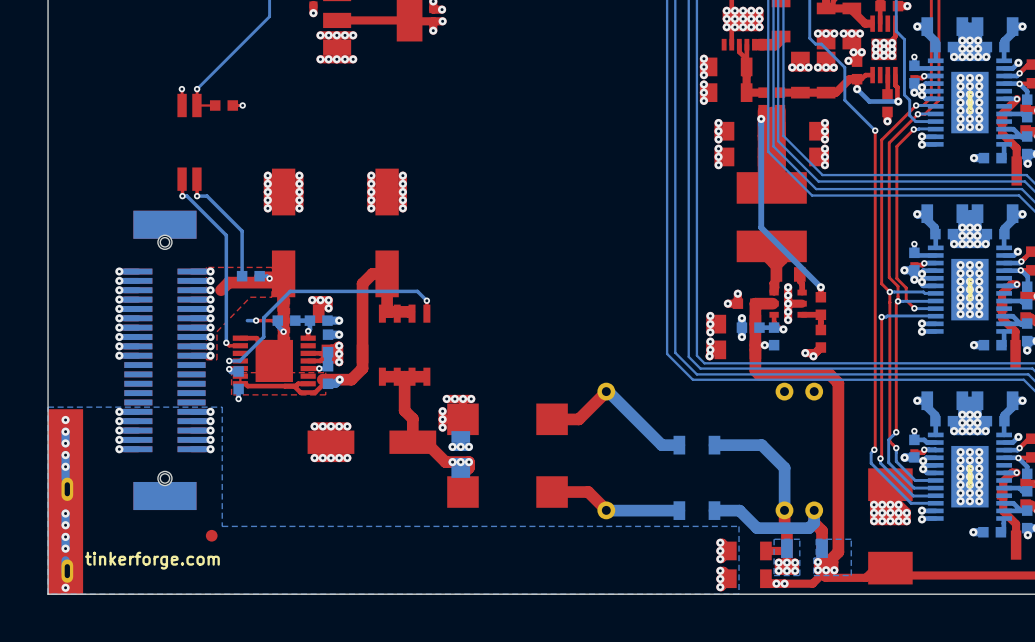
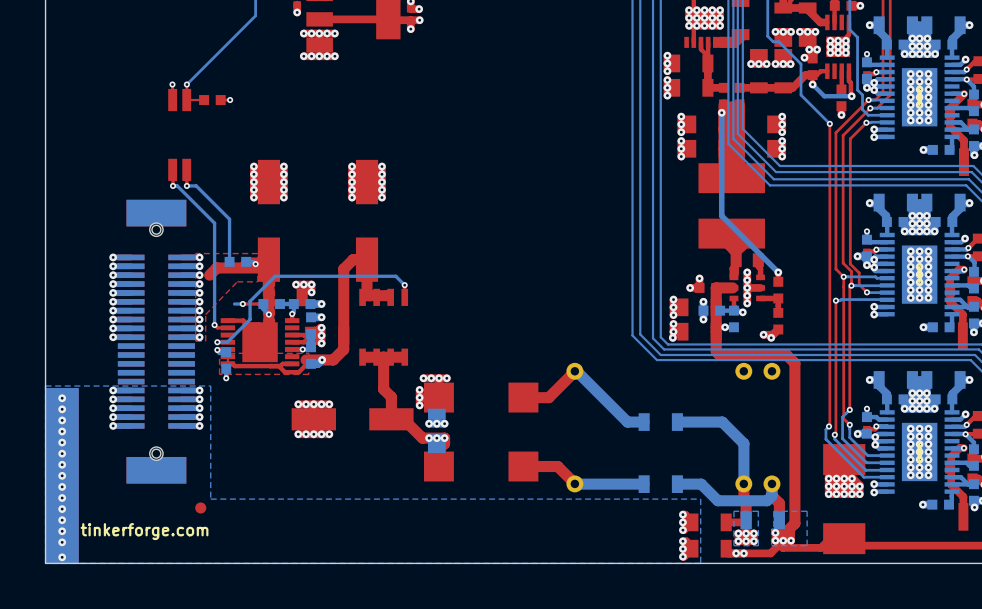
part footprint: [48, 409, 84, 595] -> [45, 387, 79, 564]
via: none -> (62, 453)
via: none -> (62, 464)
via: none -> (62, 475)
via: none -> (62, 531)
via: none -> (62, 542)

